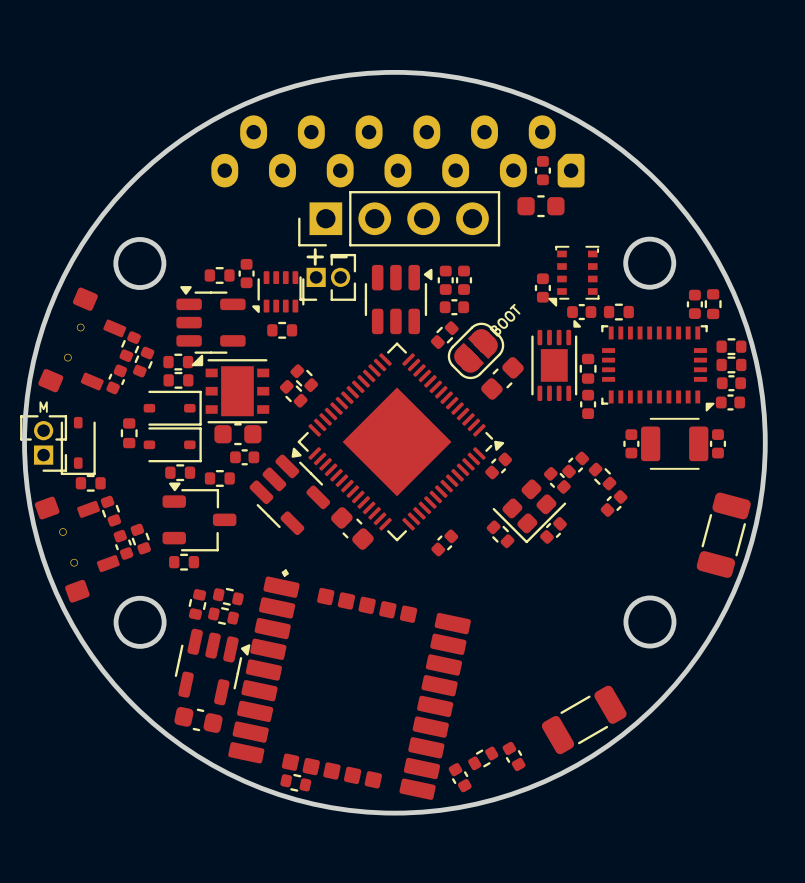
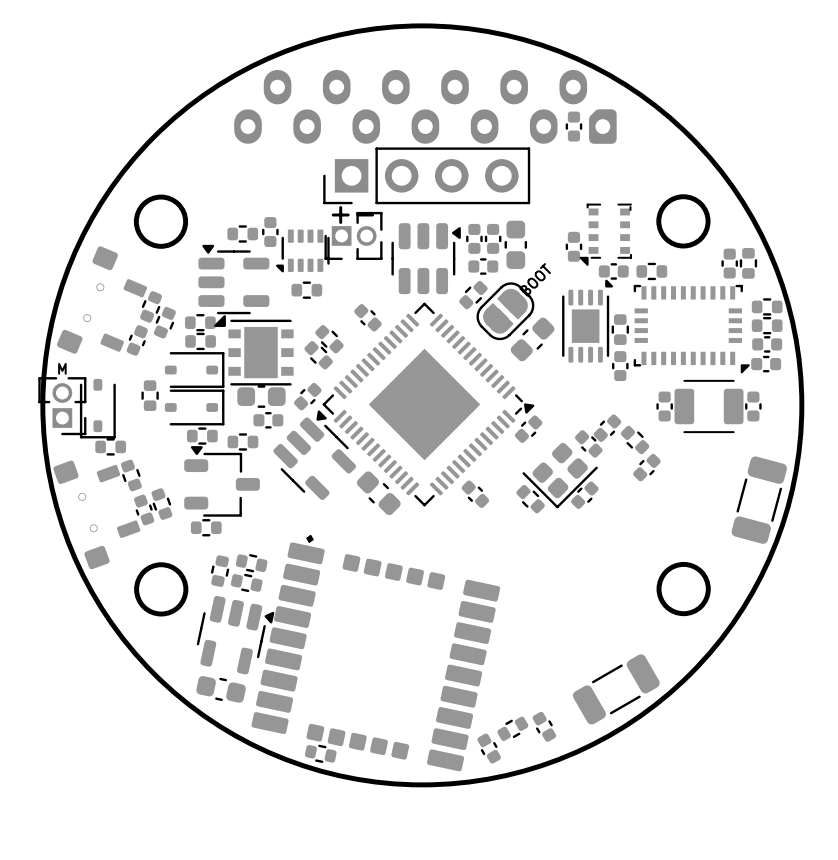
part rotation: 0° (540, 206) -> 90° clockwise (515, 244)
part position: (540, 206) -> (515, 244)
part: none -> (367, 317)
part: none -> (307, 396)
part rotation: 0° (444, 542) -> 90° clockwise (475, 494)

